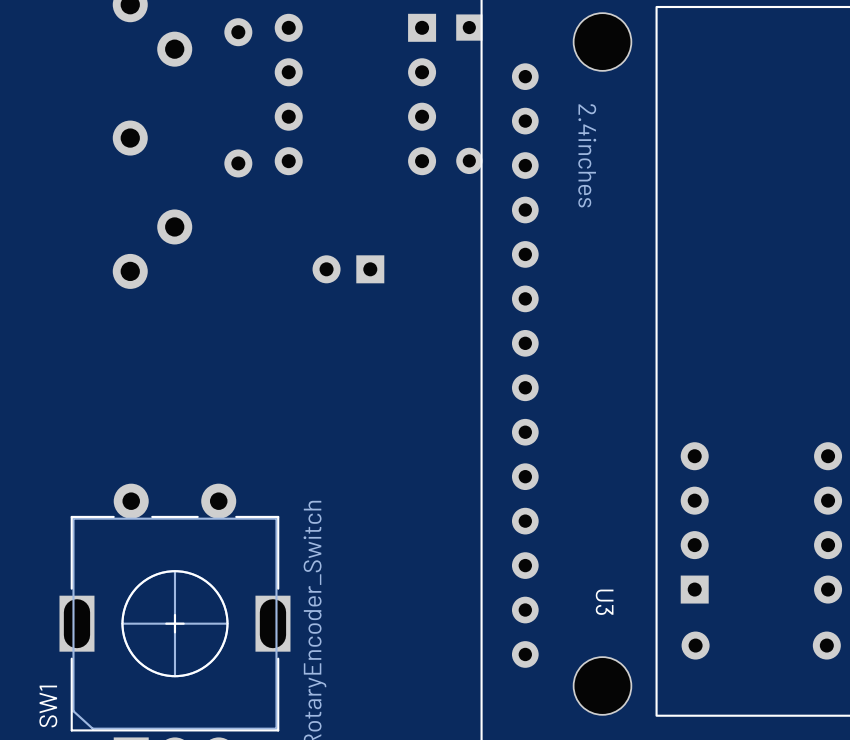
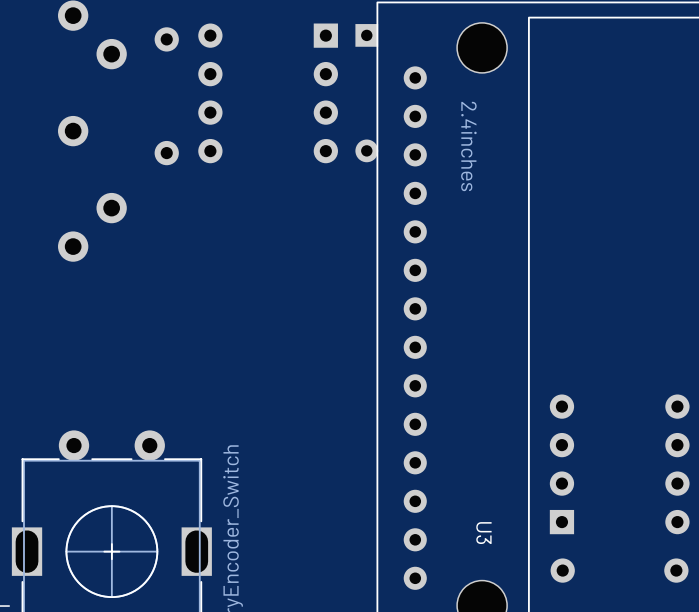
part: (348, 269) -> none

